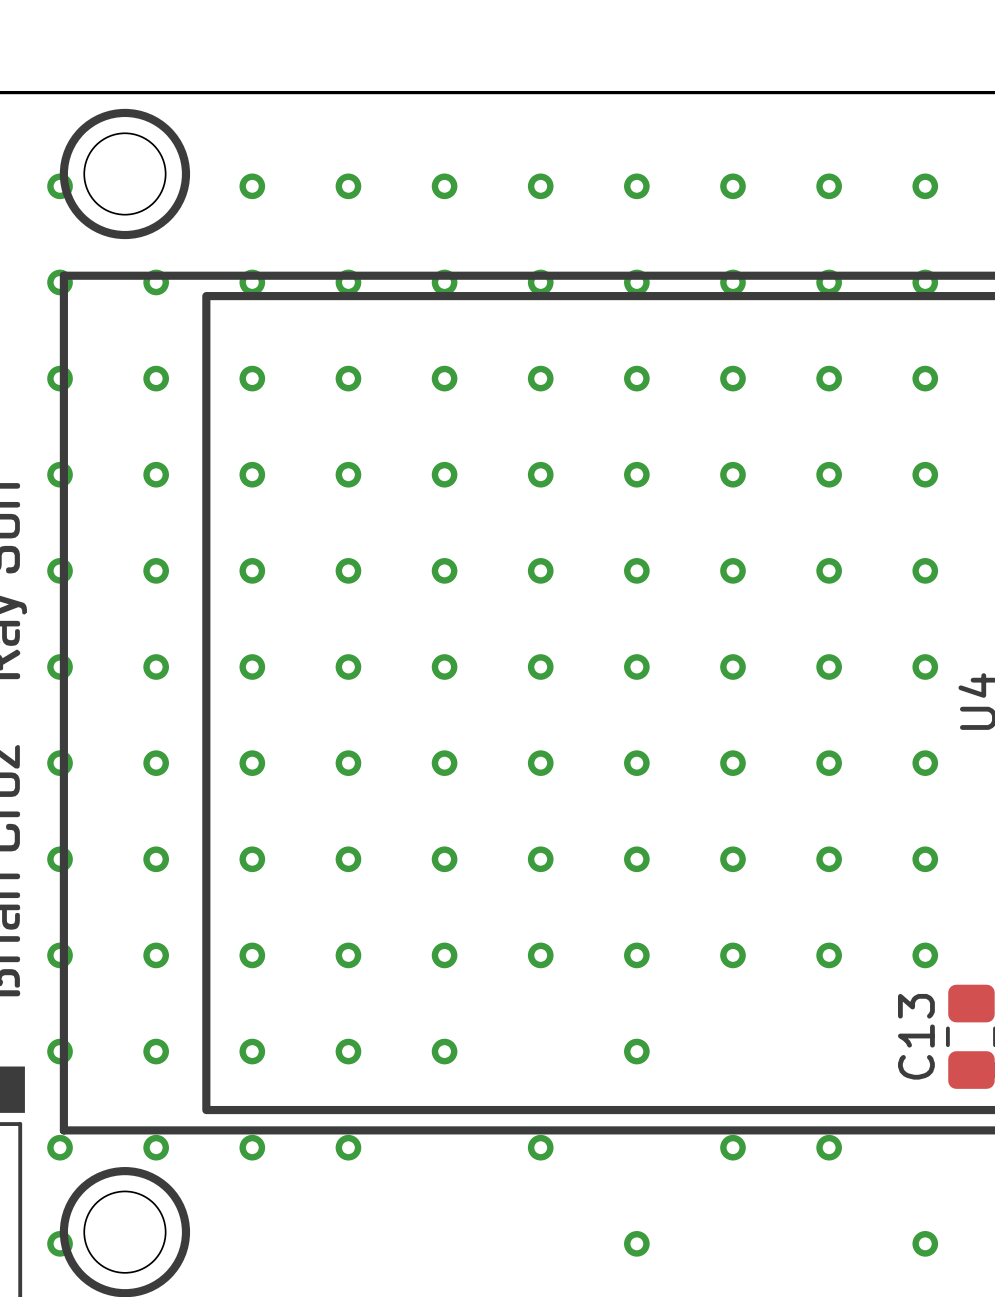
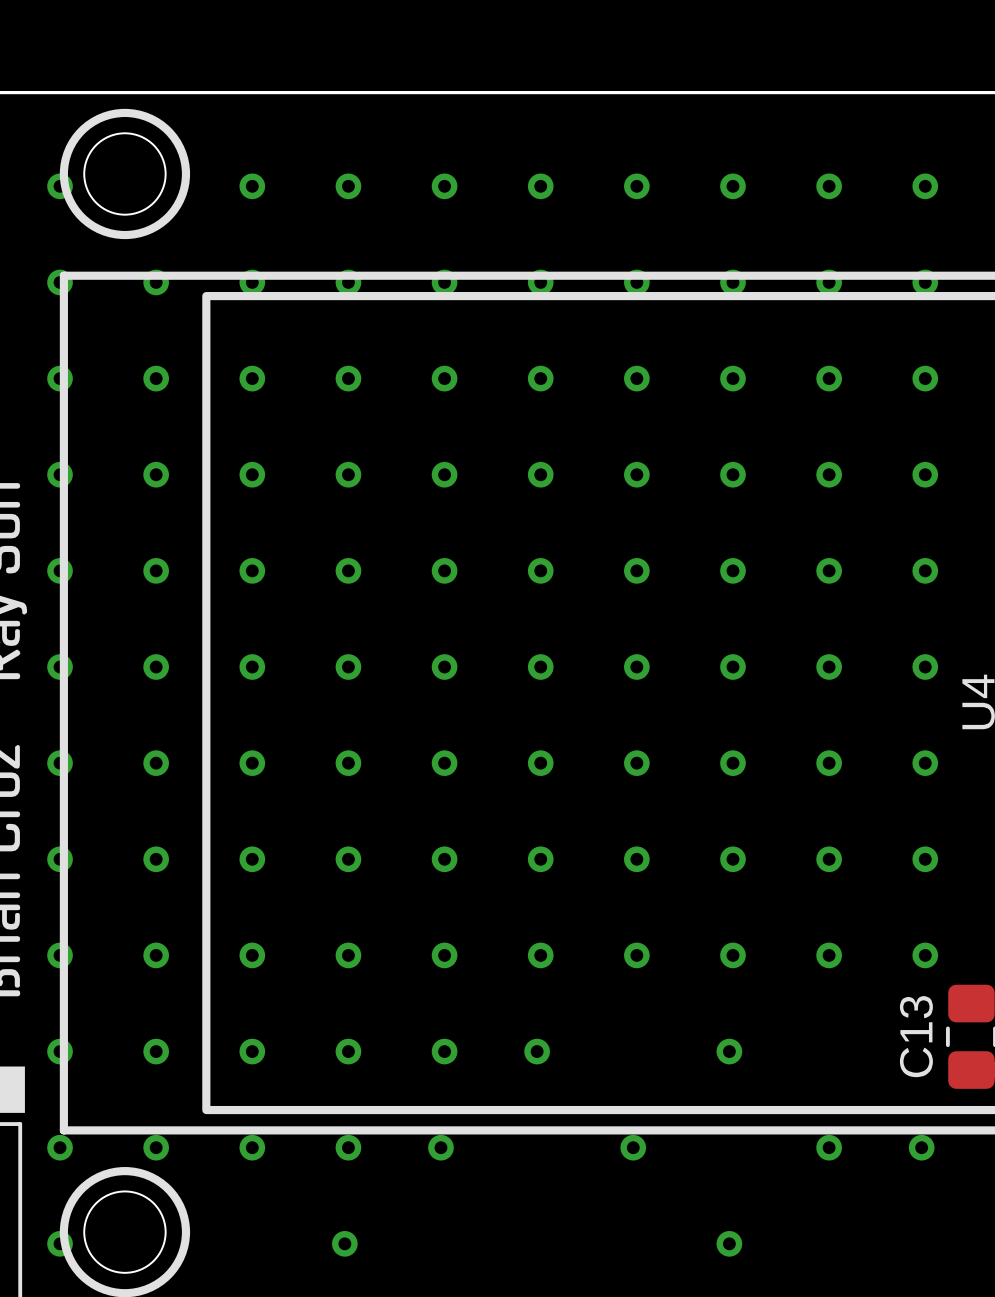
via: none -> (537, 1051)
via: (636, 1051) -> none
via: none -> (729, 1051)
via: none -> (440, 1147)
via: (540, 1147) -> none
via: none -> (633, 1147)
via: (732, 1147) -> none
via: none -> (921, 1147)
via: none -> (344, 1243)
via: (636, 1243) -> none
via: none -> (729, 1243)
via: (925, 1243) -> none

